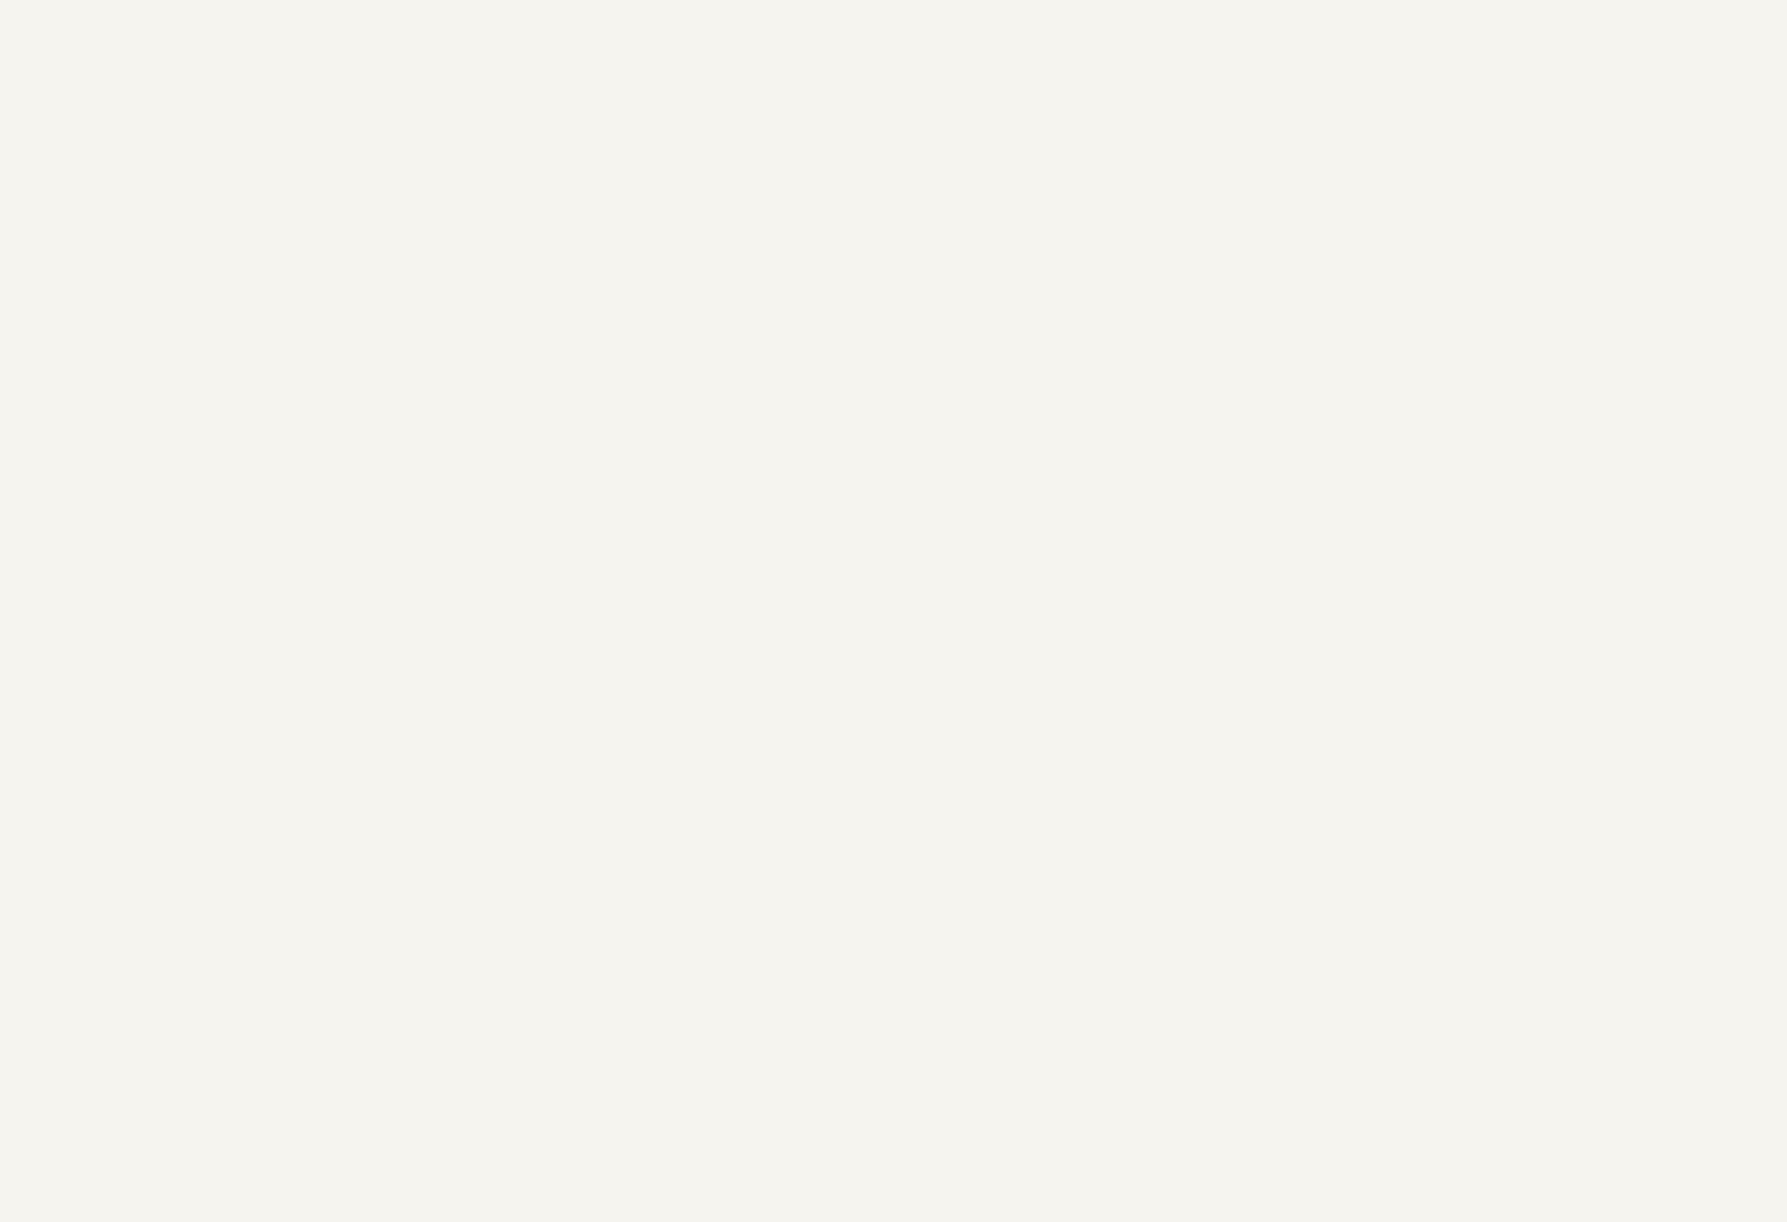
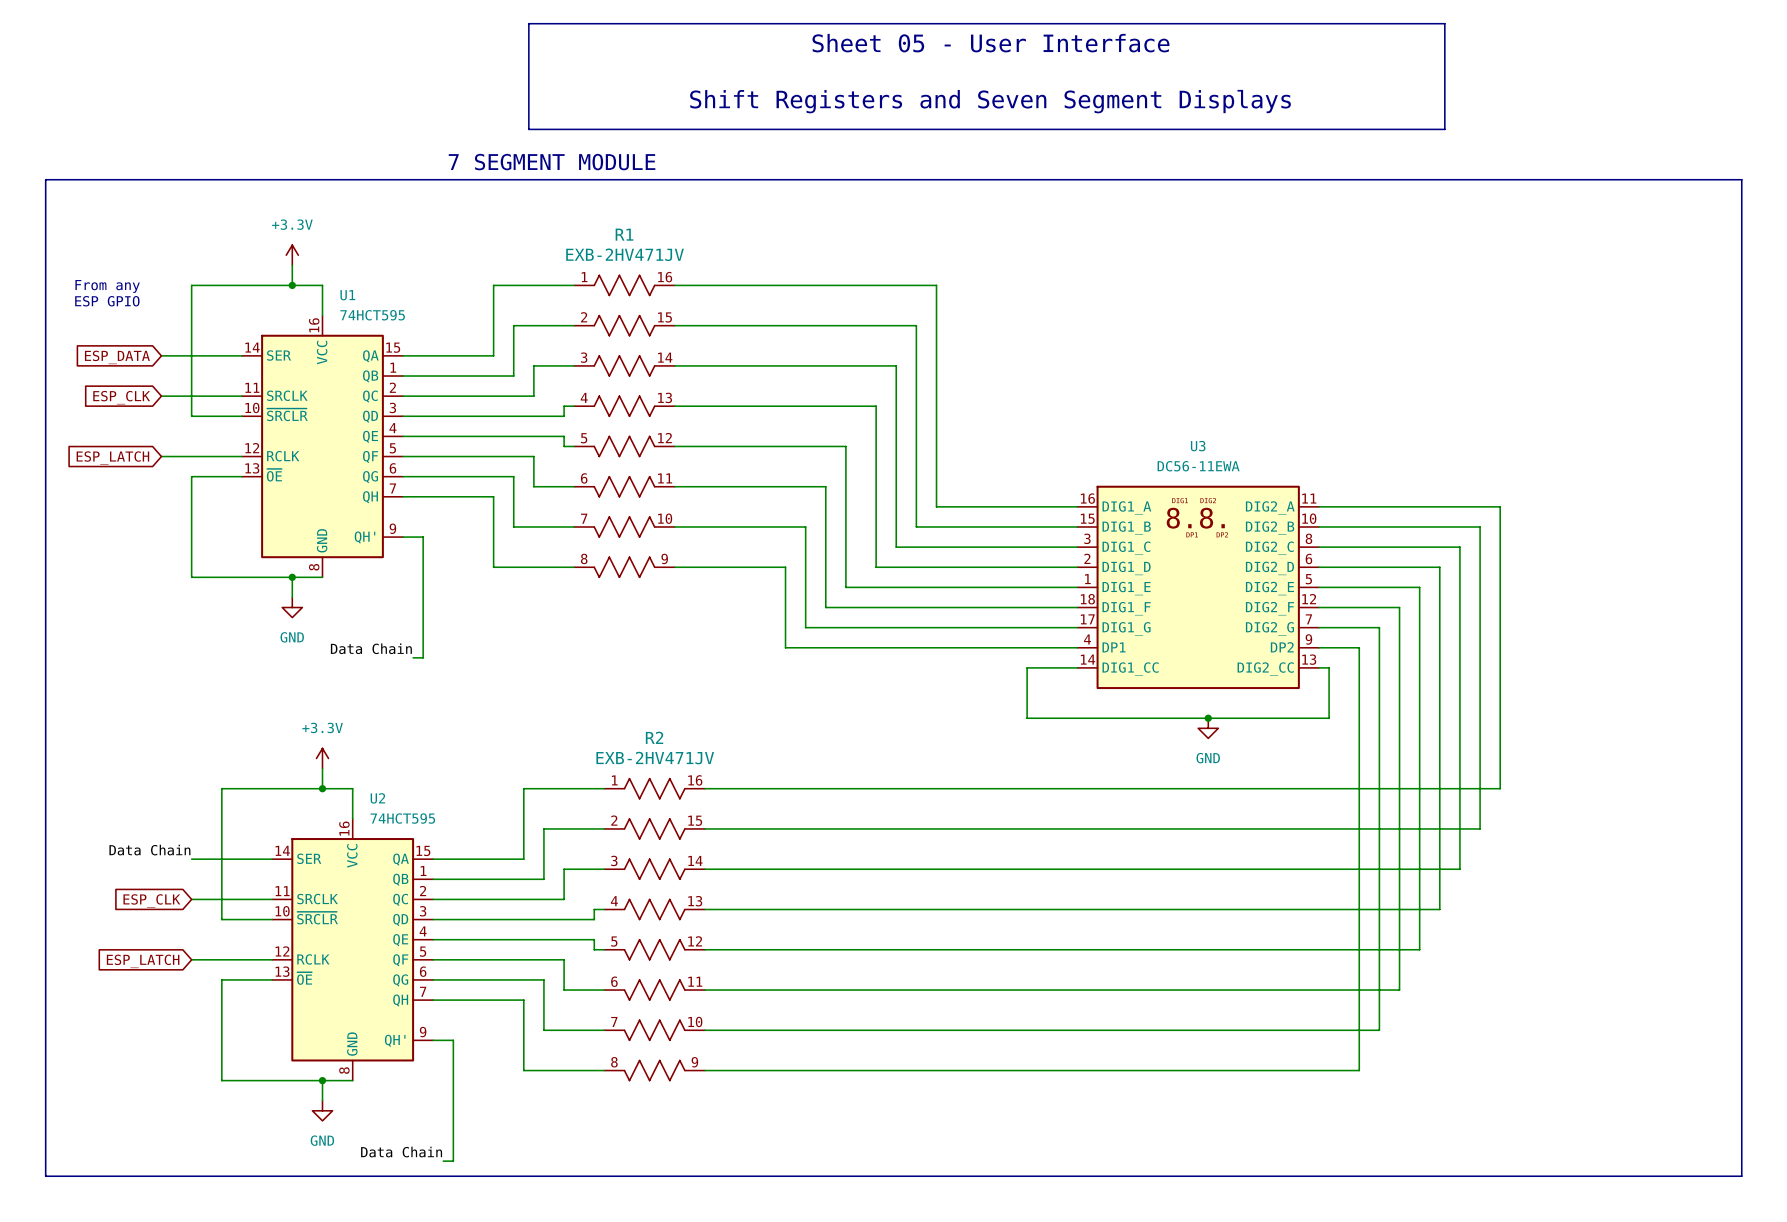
line: none -> (528, 23) (1444, 23) (1444, 129) (528, 129) (528, 23)
text: none -> Sheet 05 - User Interface (990, 43)
text: none -> Shift Registers and Seven Segment Displays (990, 101)
text: none -> 7 SEGMENT MODULE (552, 162)
line: none -> (45, 179) (1741, 179) (1741, 1176) (45, 1176) (45, 179)
power symbol: none -> +3.3V (292, 255)
wire: none -> (292, 265) (292, 285)
junction: none -> (292, 285)
wire: none -> (574, 285) (493, 285) (493, 355) (403, 355)
wire: none -> (674, 285) (936, 285) (936, 506) (1077, 506)
text: none -> From any (107, 286)
text: none -> ESP GPIO (107, 301)
wire: none -> (322, 315) (322, 285) (191, 285) (191, 416) (241, 416)
wire: none -> (574, 325) (513, 325) (513, 376) (403, 376)
wire: none -> (674, 325) (916, 325) (916, 526) (1077, 526)
wire: none -> (161, 355) (241, 355)
global label: none -> ESP_DATA (117, 357)
wire: none -> (574, 365) (533, 365) (533, 396) (403, 396)
wire: none -> (674, 365) (896, 365) (896, 547) (1077, 547)
wire: none -> (161, 396) (241, 396)
global label: none -> ESP_CLK (121, 397)
wire: none -> (574, 406) (564, 406) (564, 416) (403, 416)
wire: none -> (674, 406) (876, 406) (876, 567) (1077, 567)
R1: none -> EXB-2HV471JV (624, 426)
wire: none -> (403, 436) (564, 436) (564, 446) (574, 446)
U1: none -> 74HCT595 (322, 446)
wire: none -> (674, 446) (845, 446) (845, 587) (1077, 587)
wire: none -> (161, 456) (241, 456)
wire: none -> (403, 456) (533, 456) (533, 486) (574, 486)
global label: none -> ESP_LATCH (112, 458)
wire: none -> (241, 476) (191, 476) (191, 577) (322, 577)
wire: none -> (403, 476) (513, 476) (513, 526) (574, 526)
wire: none -> (674, 486) (825, 486) (825, 607) (1077, 607)
wire: none -> (403, 496) (493, 496) (493, 567) (574, 567)
wire: none -> (1319, 506) (1500, 506) (1500, 788) (705, 788)
wire: none -> (674, 526) (805, 526) (805, 627) (1077, 627)
wire: none -> (1319, 526) (1480, 526) (1480, 828) (705, 828)
wire: none -> (403, 537) (423, 537) (423, 657) (413, 657)
wire: none -> (1319, 547) (1459, 547) (1459, 869) (705, 869)
wire: none -> (674, 567) (785, 567) (785, 647) (1077, 647)
wire: none -> (1319, 567) (1439, 567) (1439, 909) (705, 909)
wire: none -> (292, 577) (292, 597)
junction: none -> (292, 577)
U3: none -> DC56-11EWA (1198, 587)
wire: none -> (1319, 587) (1419, 587) (1419, 949) (705, 949)
power symbol: none -> GND (292, 607)
wire: none -> (1319, 607) (1399, 607) (1399, 990) (705, 990)
wire: none -> (1319, 627) (1379, 627) (1379, 1030) (705, 1030)
wire: none -> (1319, 647) (1359, 647) (1359, 1070) (705, 1070)
label: none -> Data Chain (371, 648)
wire: none -> (1077, 667) (1027, 667) (1027, 718) (1329, 718) (1329, 667) (1319, 667)
junction: none -> (1208, 718)
power symbol: none -> GND (1208, 728)
power symbol: none -> +3.3V (322, 758)
wire: none -> (322, 768) (322, 788)
junction: none -> (322, 788)
wire: none -> (604, 788) (523, 788) (523, 859) (433, 859)
wire: none -> (352, 818) (352, 788) (221, 788) (221, 919) (272, 919)
wire: none -> (604, 828) (543, 828) (543, 879) (433, 879)
label: none -> Data Chain (149, 850)
wire: none -> (191, 859) (272, 859)
wire: none -> (604, 869) (564, 869) (564, 899) (433, 899)
wire: none -> (191, 899) (272, 899)
global label: none -> ESP_CLK (151, 900)
wire: none -> (604, 909) (594, 909) (594, 919) (433, 919)
R2: none -> EXB-2HV471JV (654, 929)
wire: none -> (433, 939) (594, 939) (594, 949) (604, 949)
U2: none -> 74HCT595 (352, 949)
wire: none -> (191, 959) (272, 959)
wire: none -> (433, 959) (564, 959) (564, 990) (604, 990)
global label: none -> ESP_LATCH (143, 961)
wire: none -> (272, 979) (221, 979) (221, 1080) (352, 1080)
wire: none -> (433, 979) (543, 979) (543, 1030) (604, 1030)
wire: none -> (433, 1000) (523, 1000) (523, 1070) (604, 1070)
wire: none -> (433, 1040) (453, 1040) (453, 1161) (443, 1161)
wire: none -> (322, 1080) (322, 1100)
junction: none -> (322, 1080)
power symbol: none -> GND (322, 1110)
label: none -> Data Chain (401, 1152)

